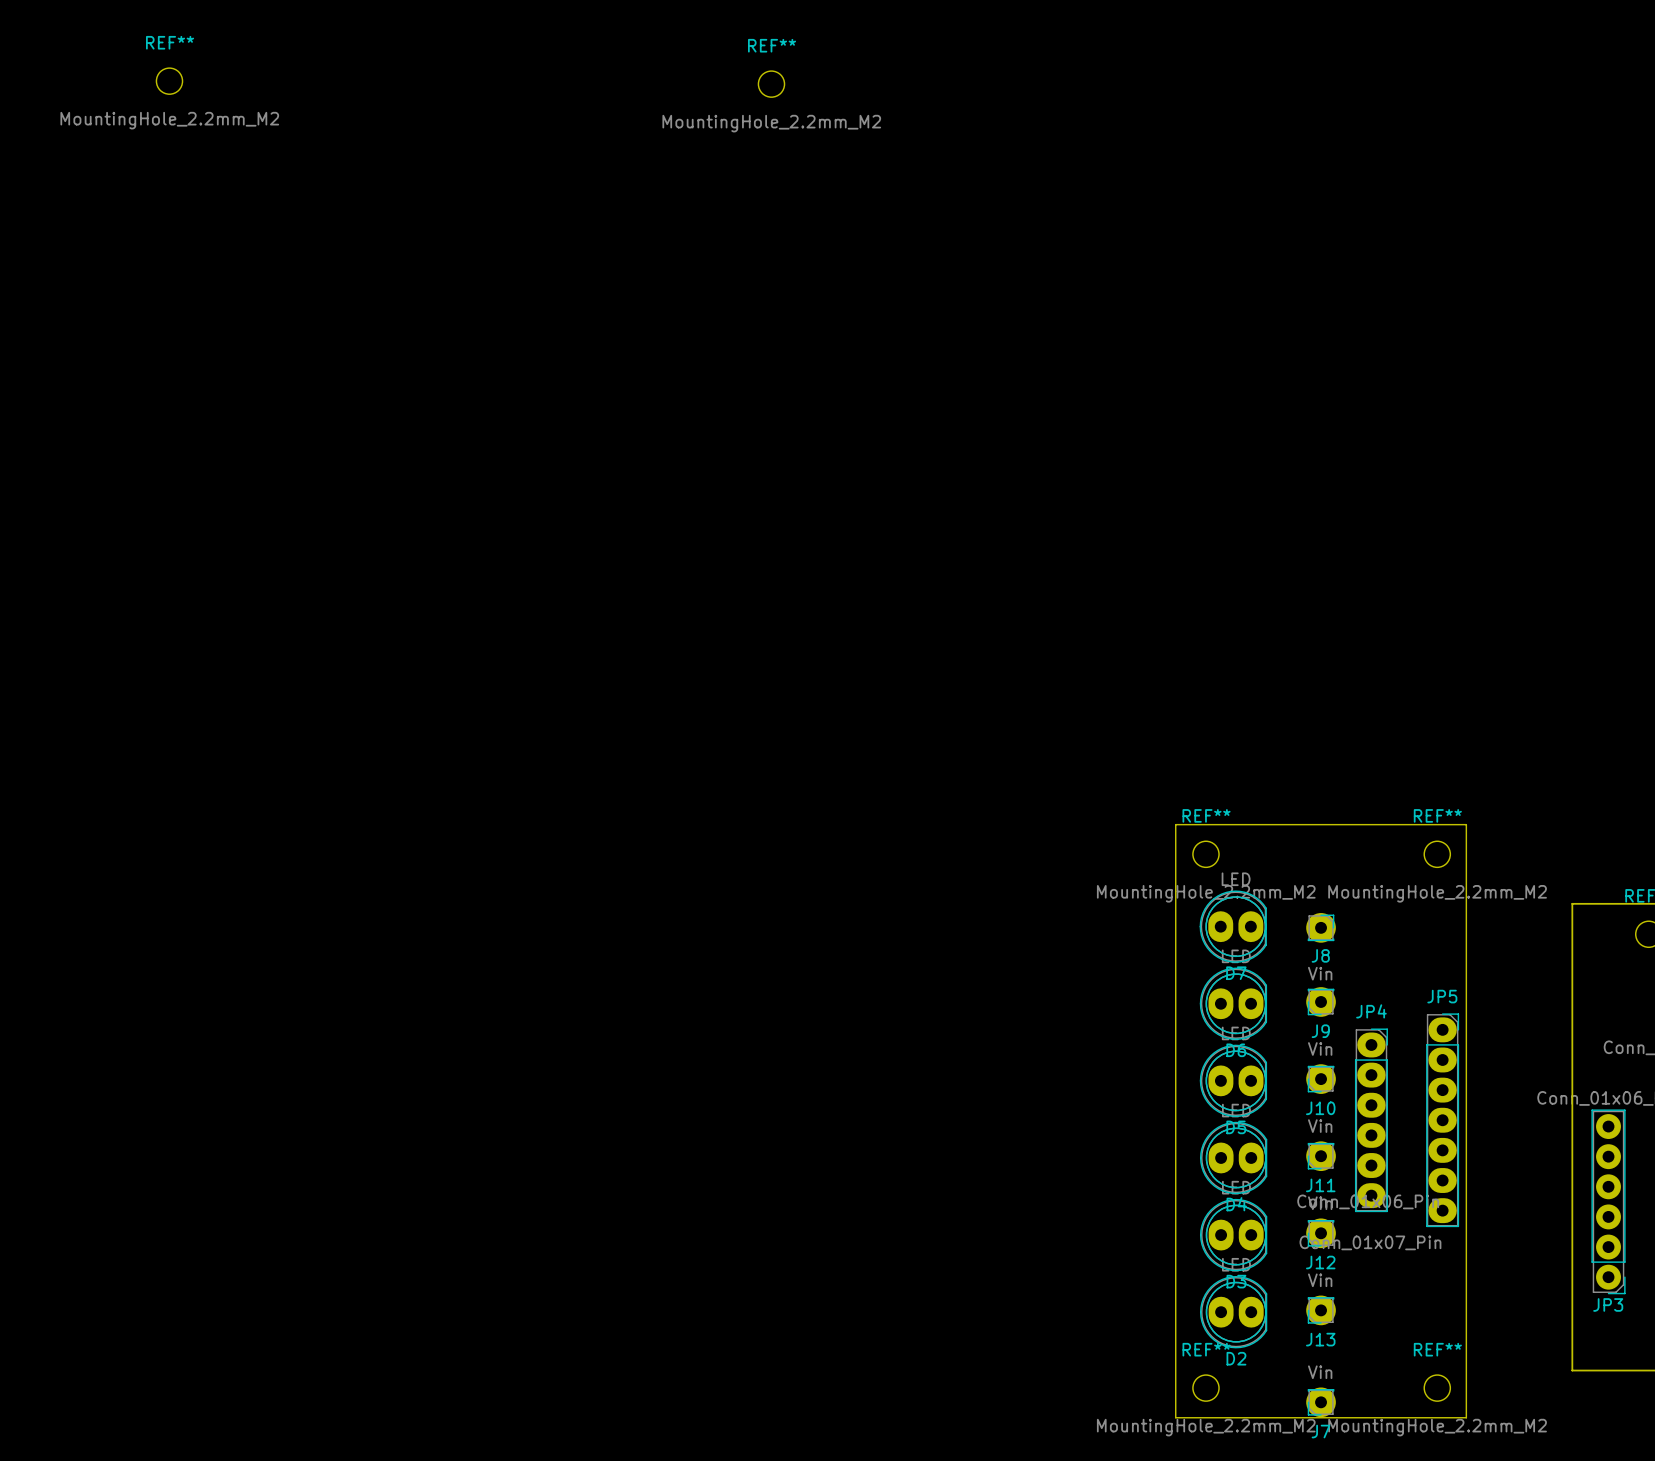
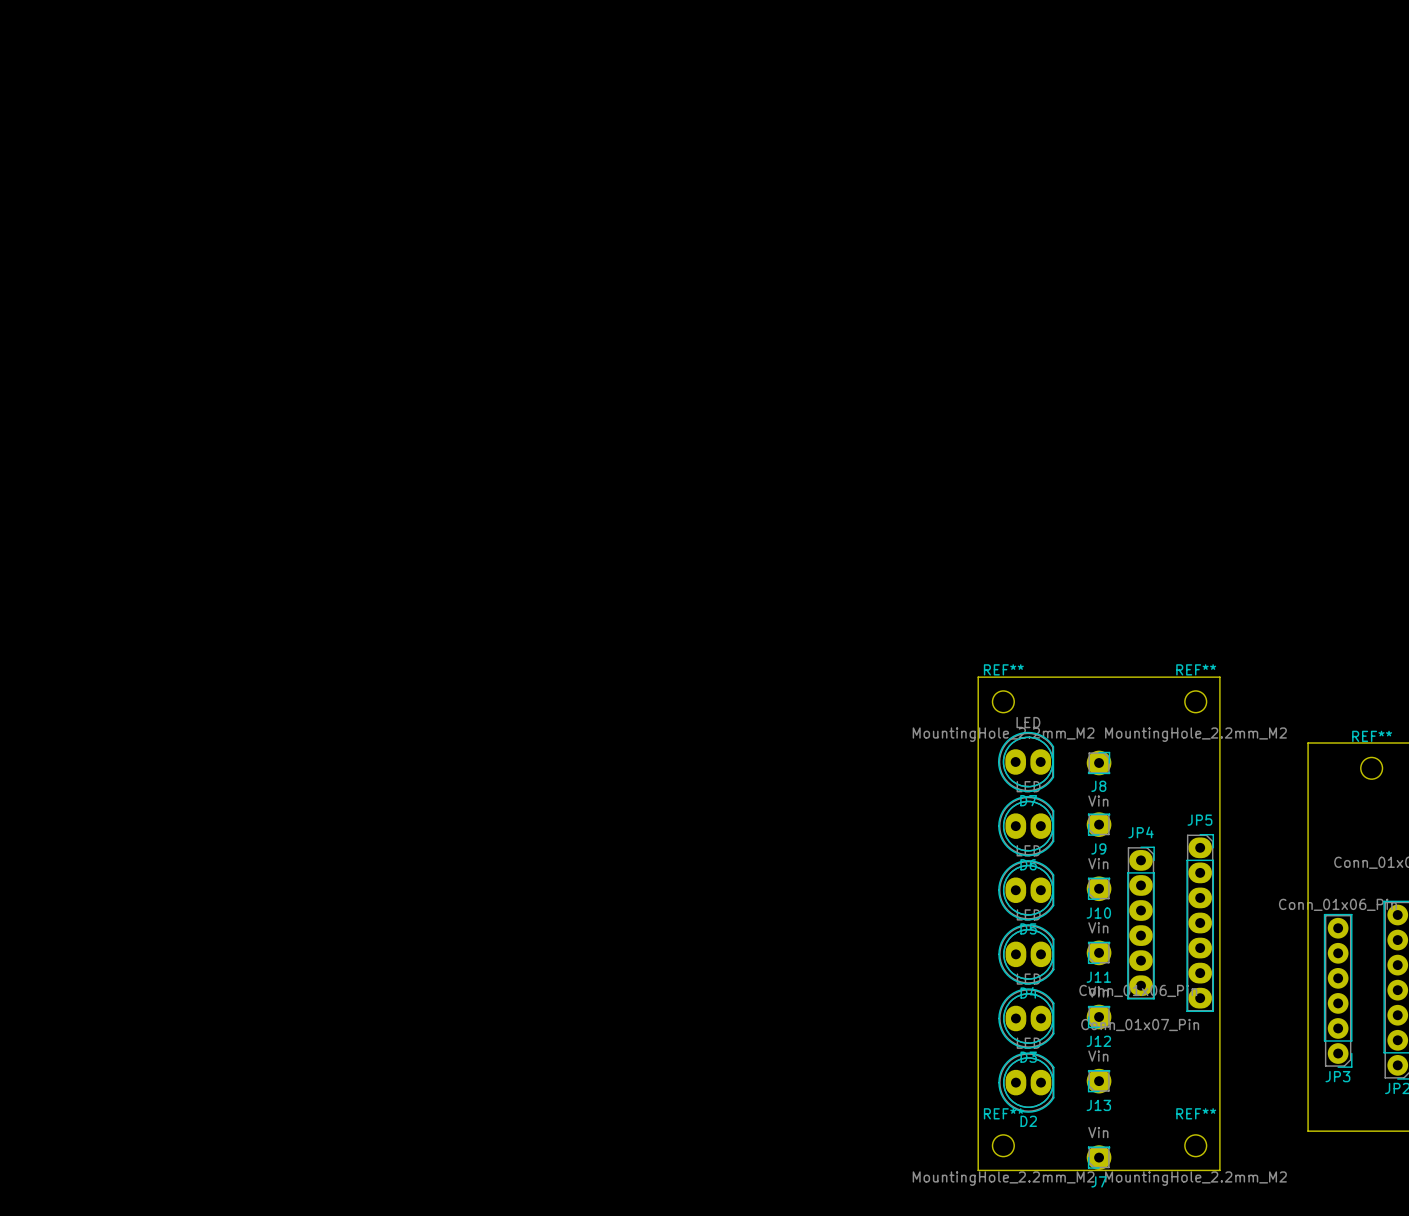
REF**: MountingHole_2.2mm_M2 (169, 81) -> none
REF**: MountingHole_2.2mm_M2 (771, 84) -> none

